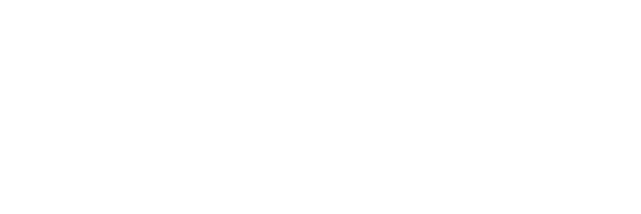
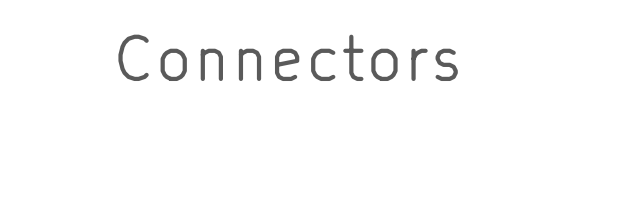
text: none -> Connectors (288, 57)

